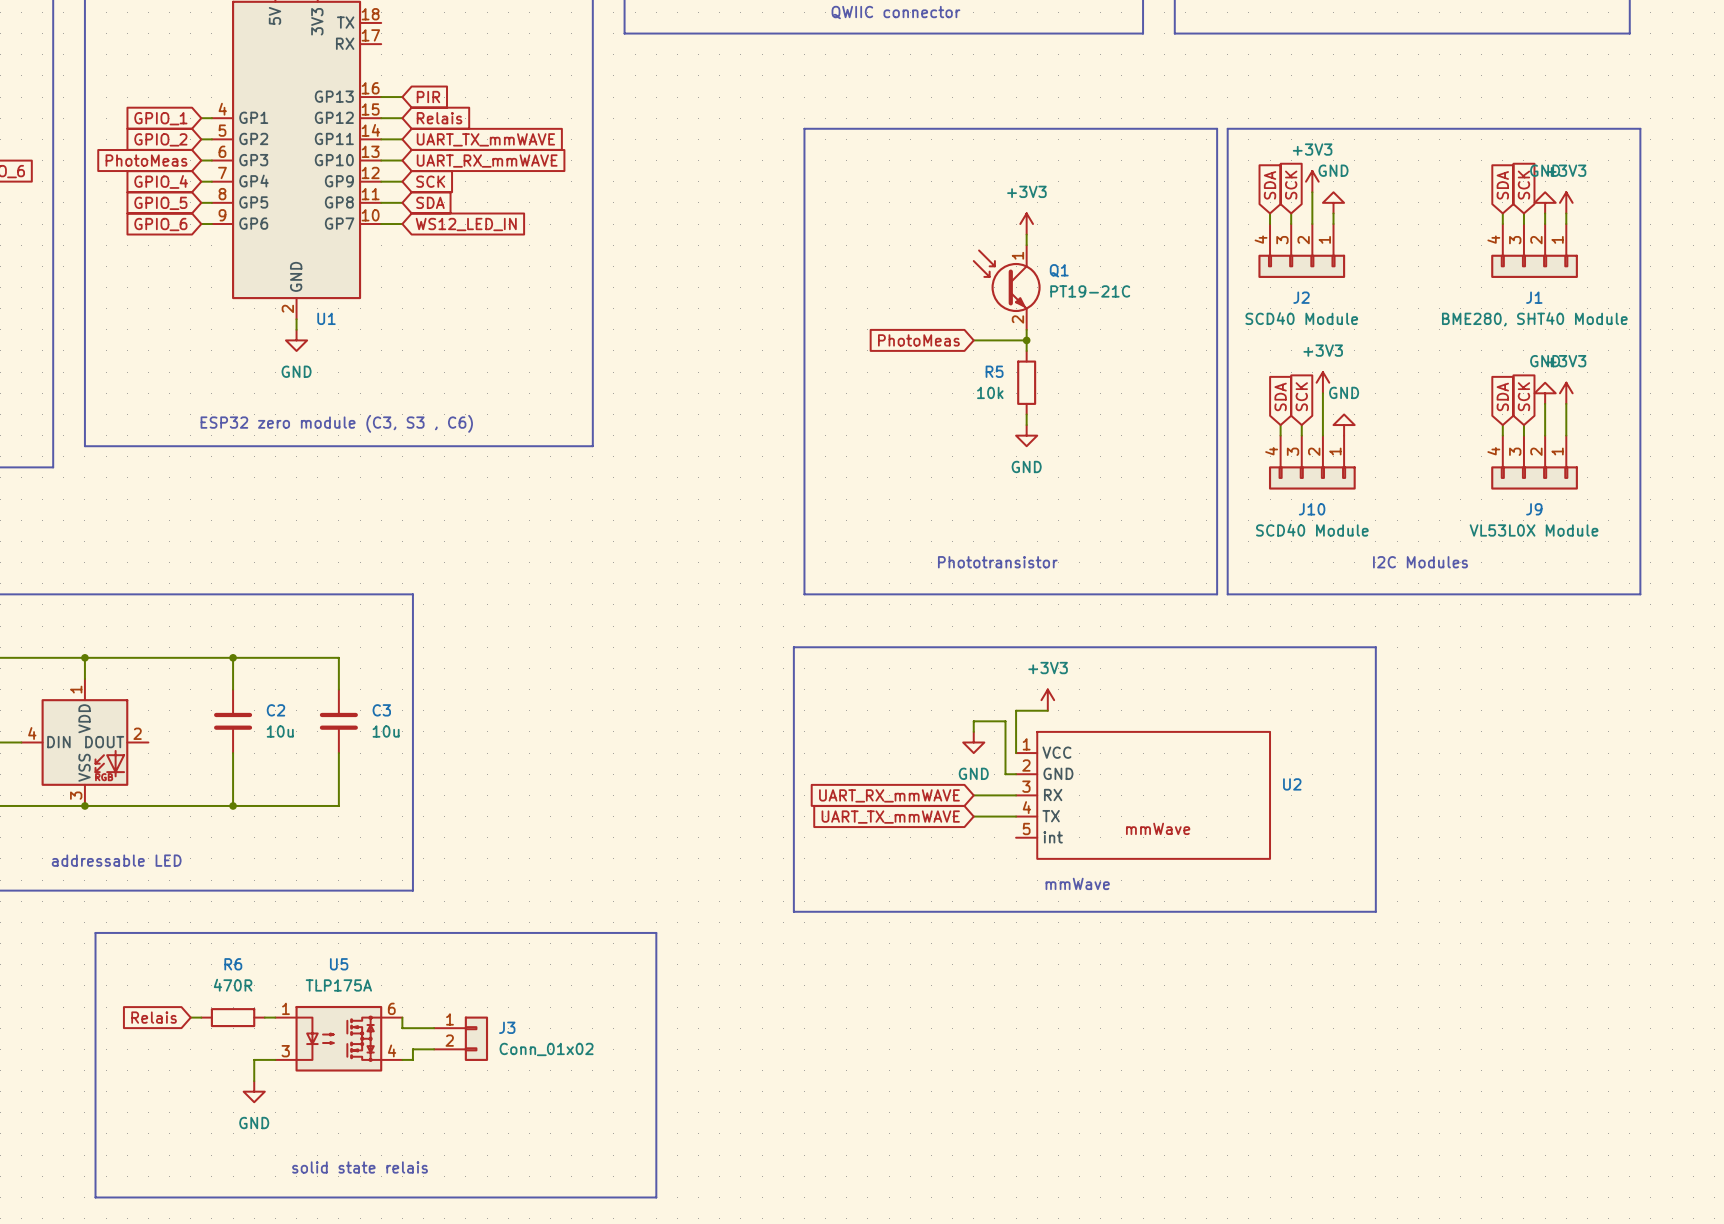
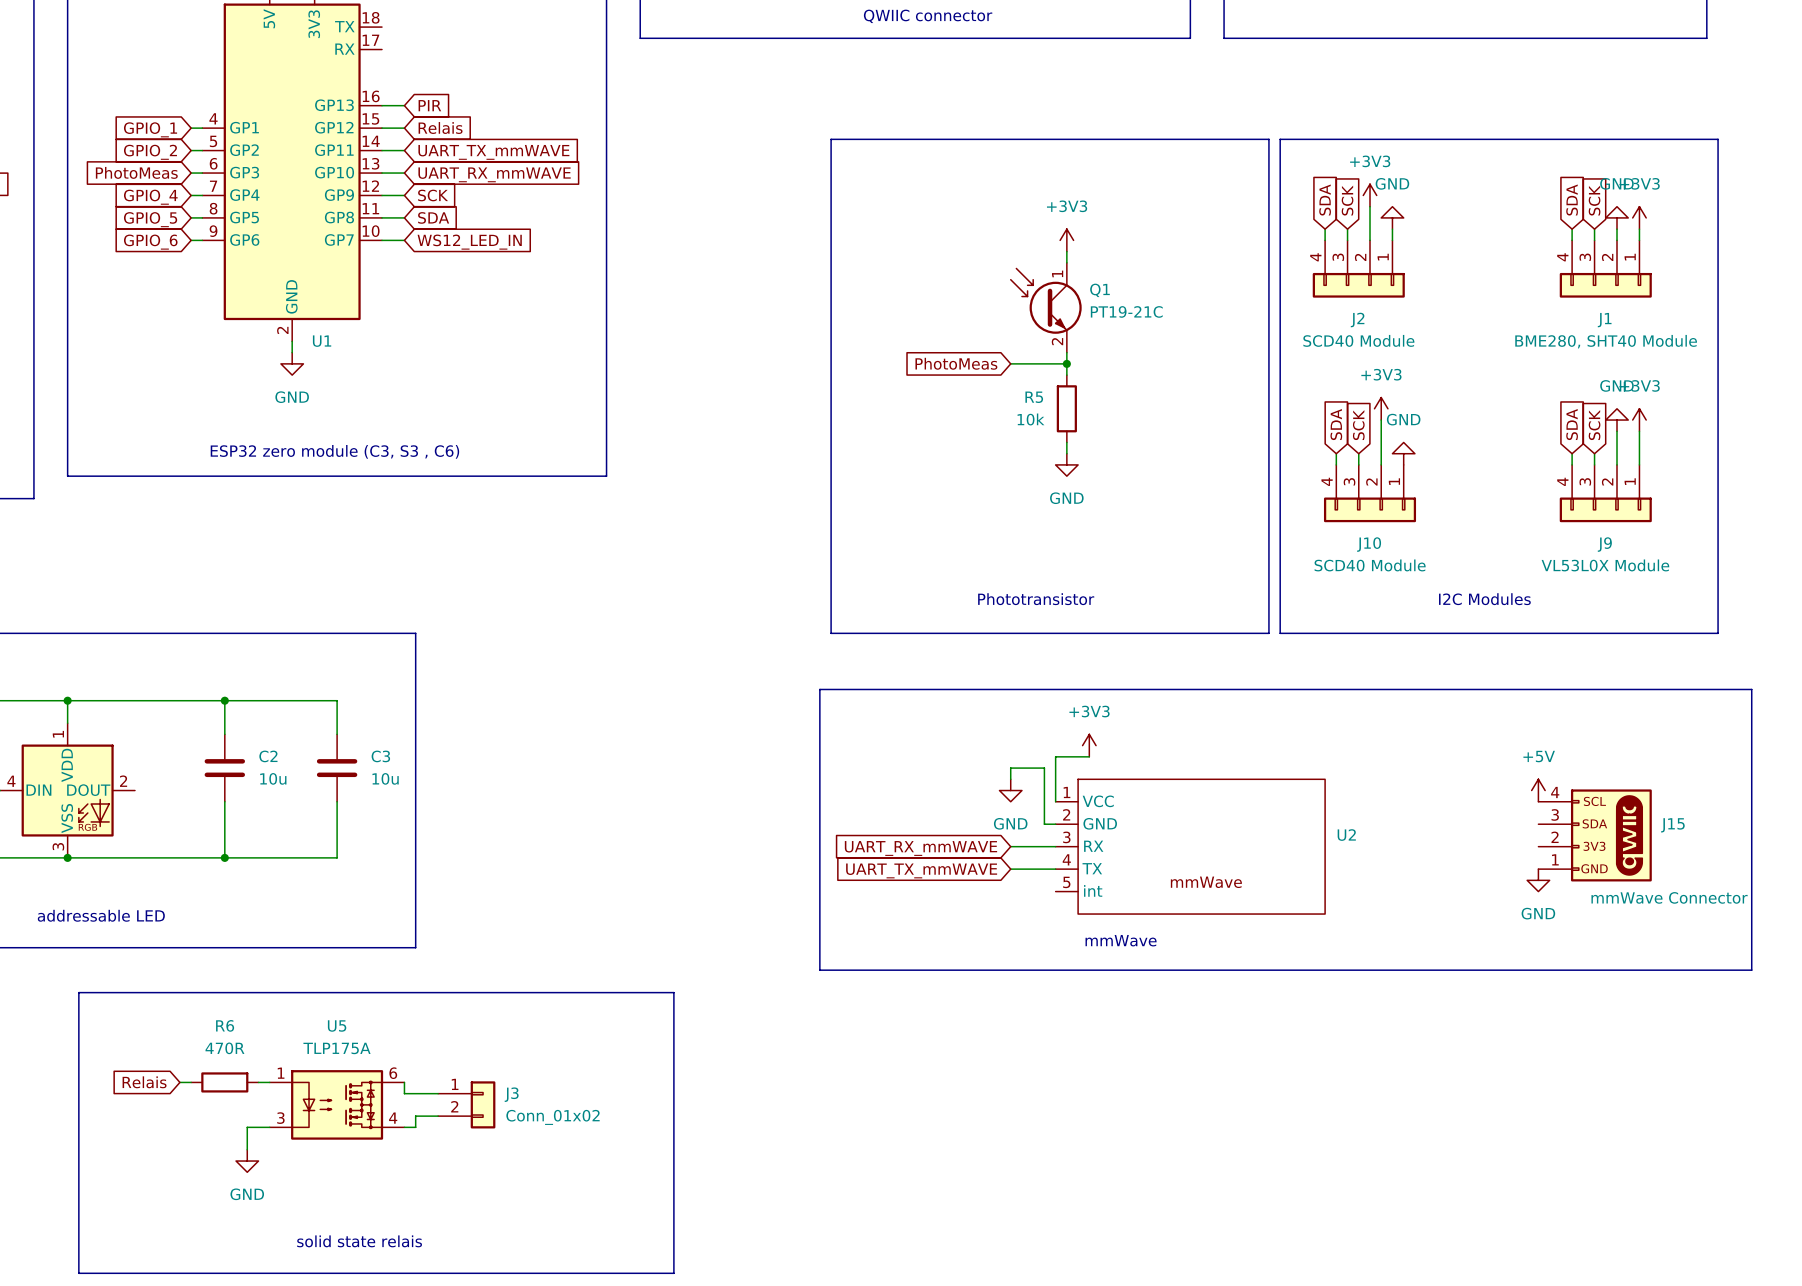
line: (1375, 647) (1375, 911) -> (1437, 689) (1751, 689) (1751, 970) (1437, 970)
power symbol: none -> +5V (1538, 790)
J15: none -> mmWave Connector (1595, 835)
power symbol: none -> GND (1538, 880)

